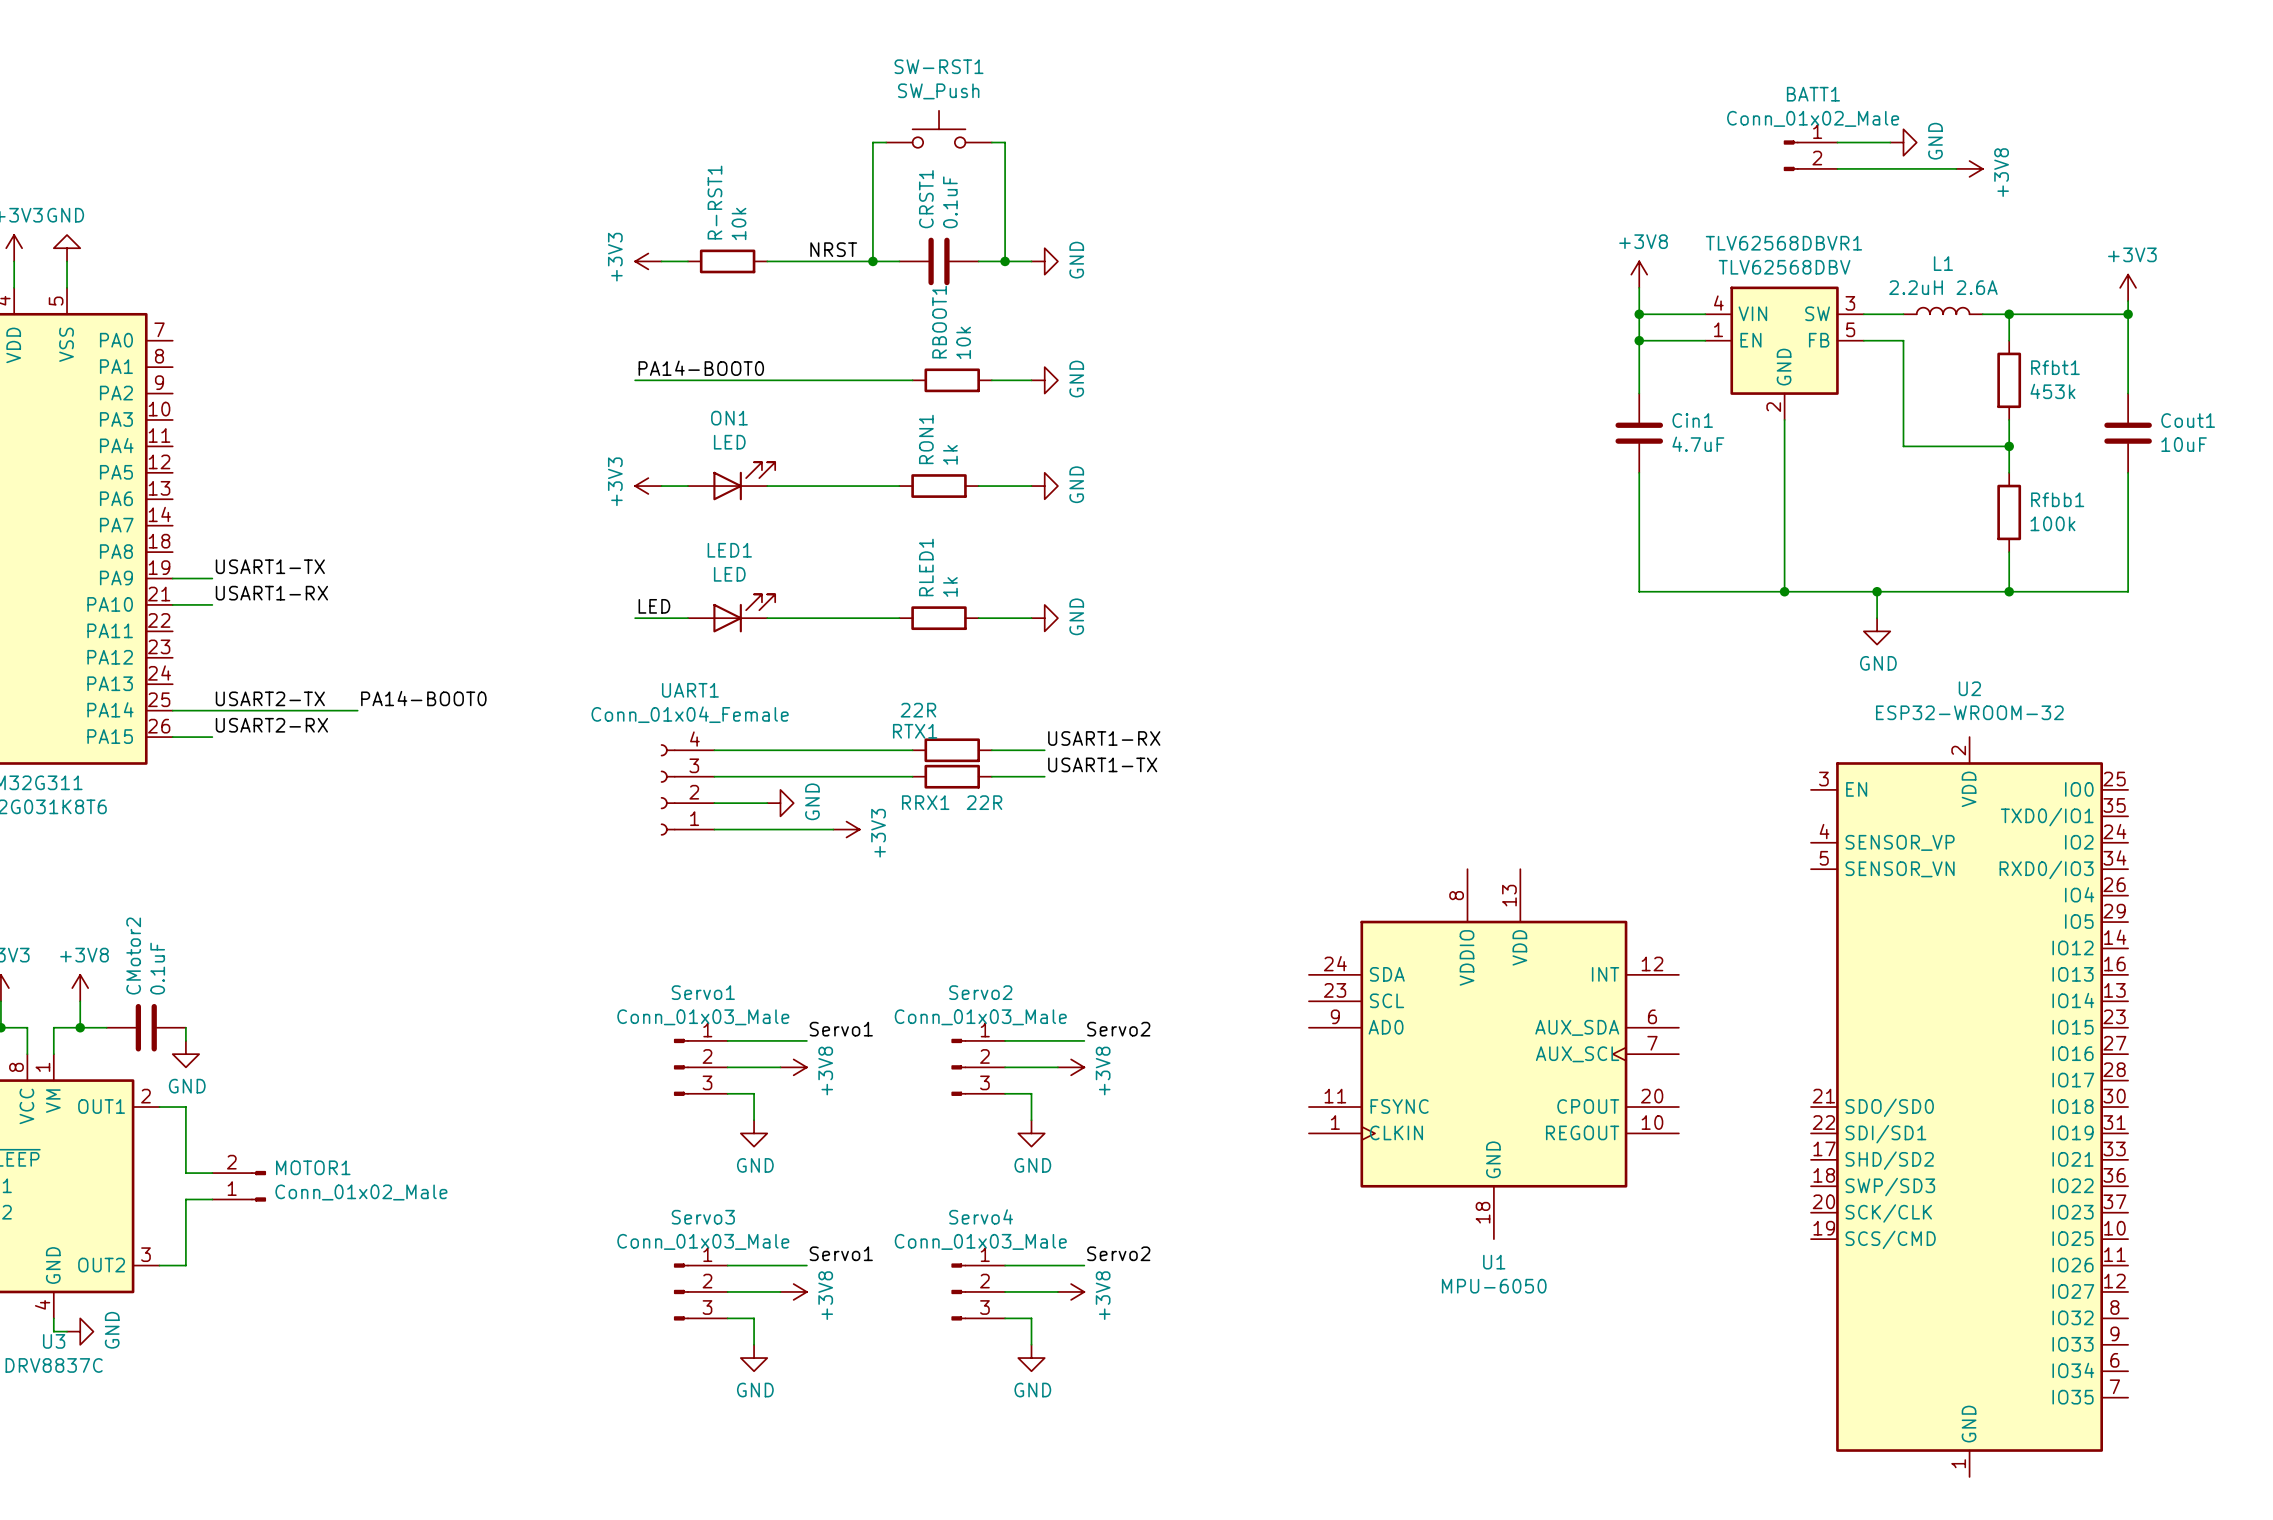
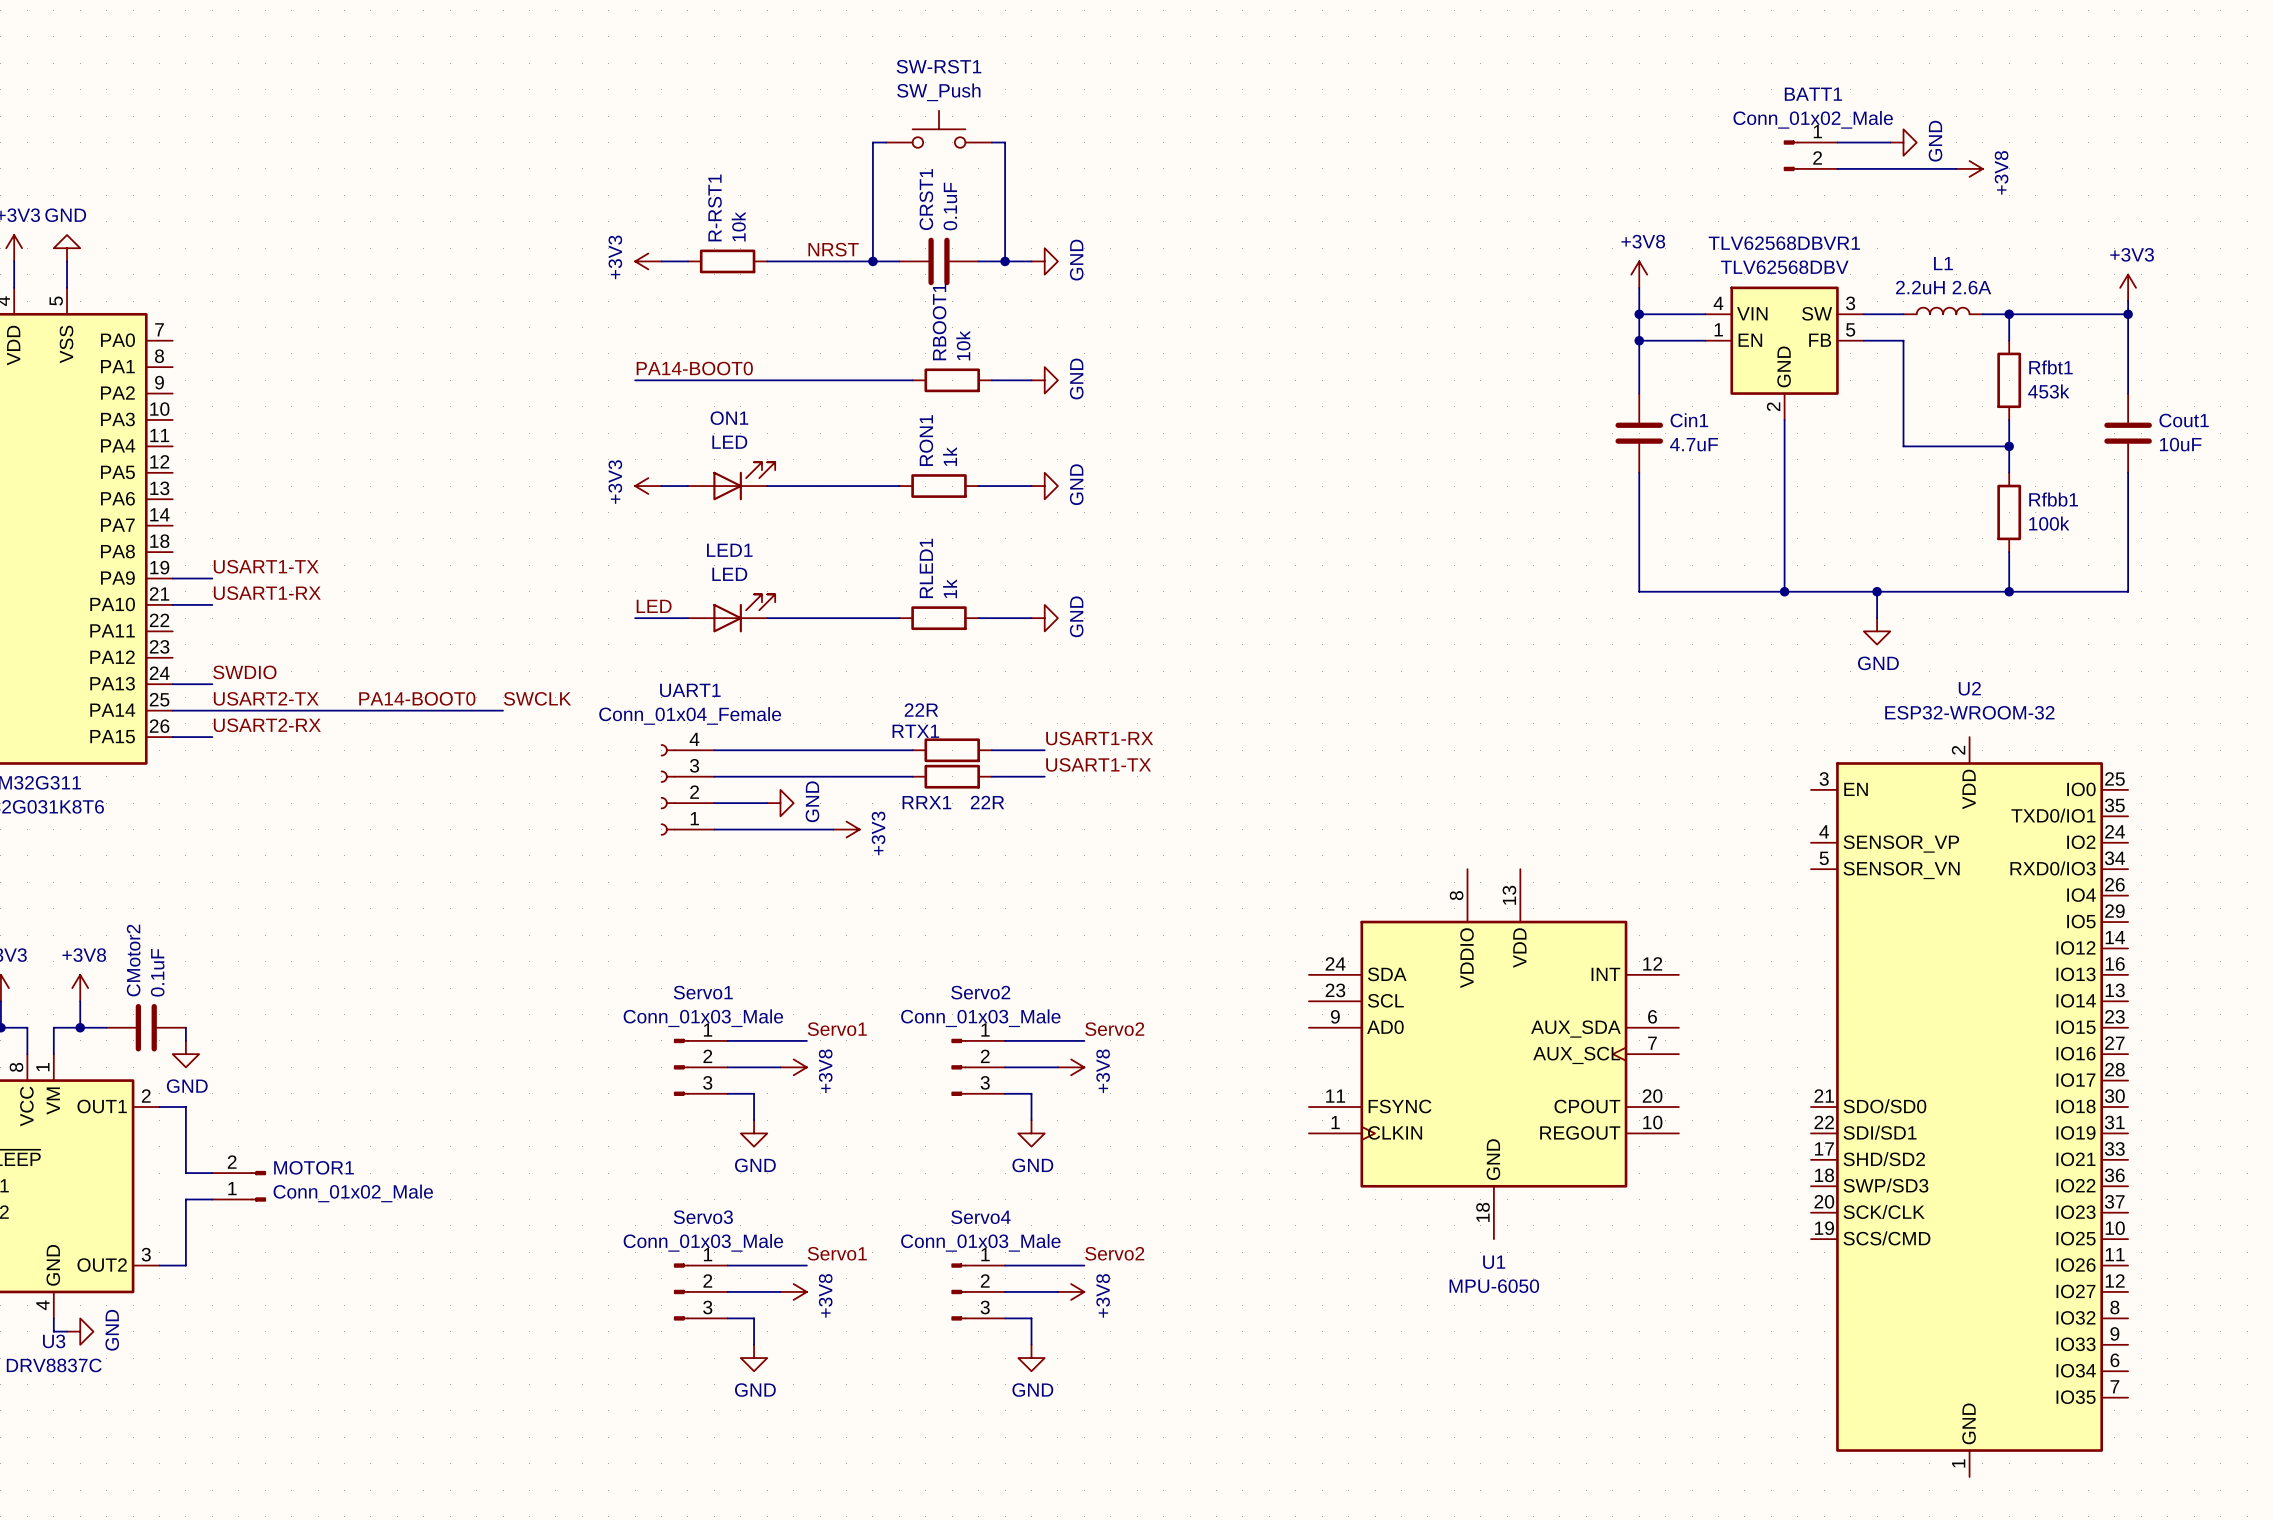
label: none -> SWDIO (244, 672)
wire: none -> (172, 684) (212, 684)
label: none -> SWCLK (537, 698)
wire: none -> (357, 710) (503, 710)

